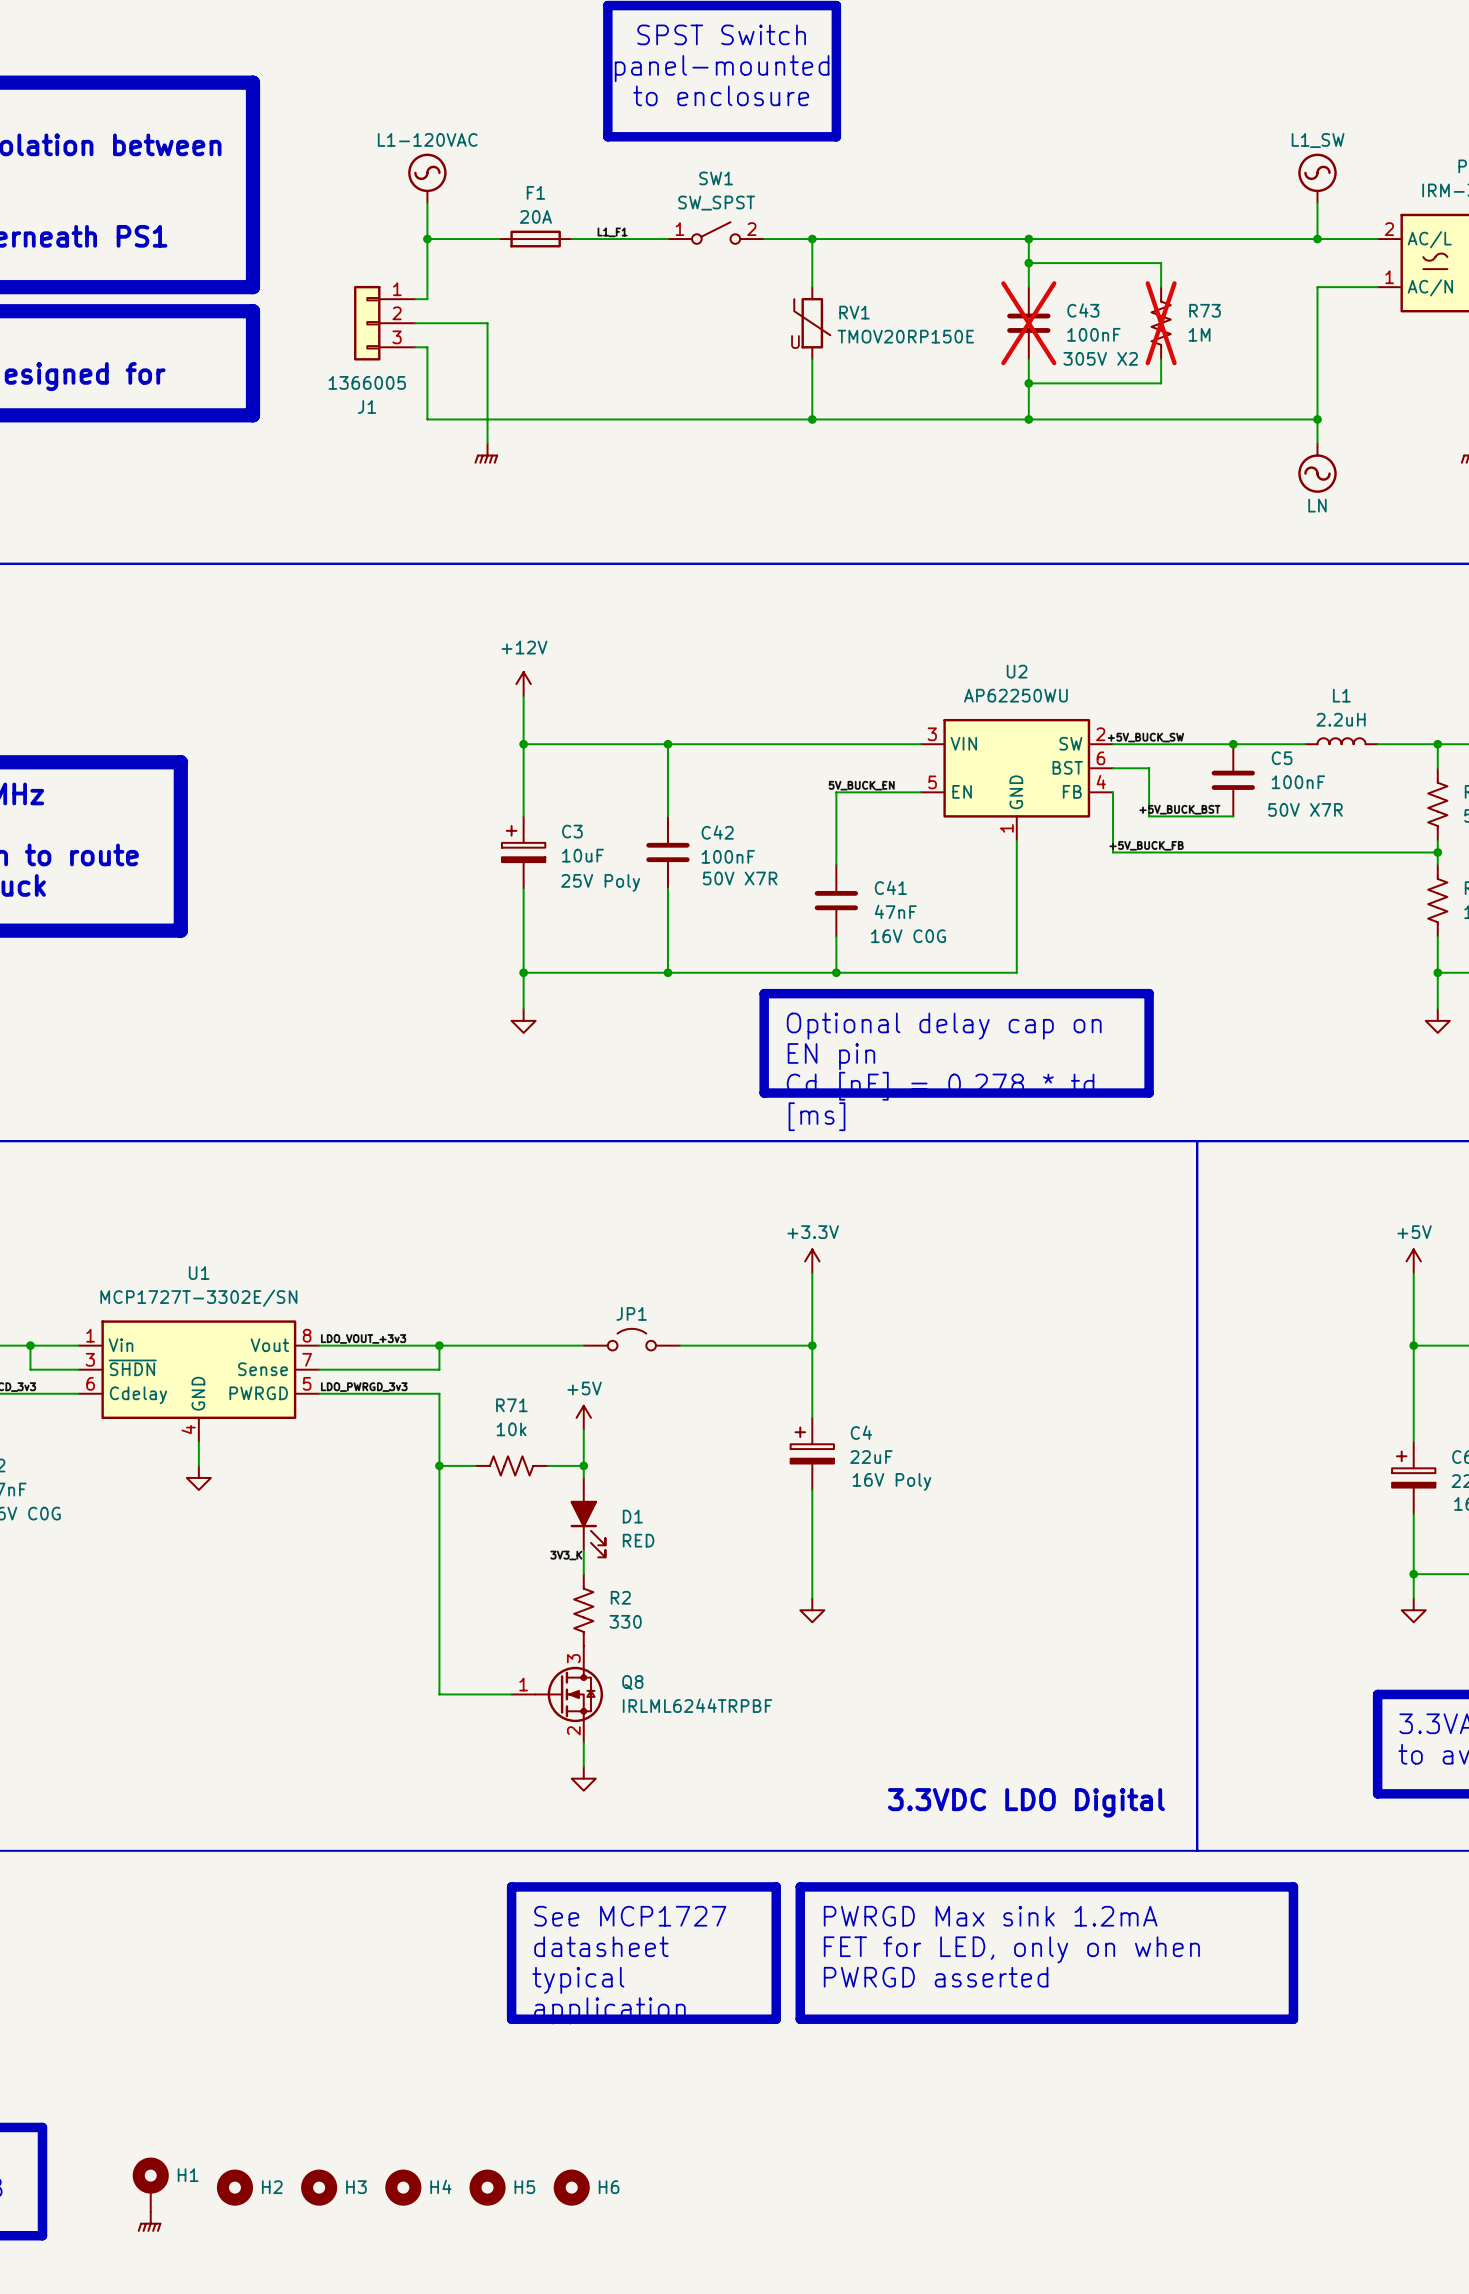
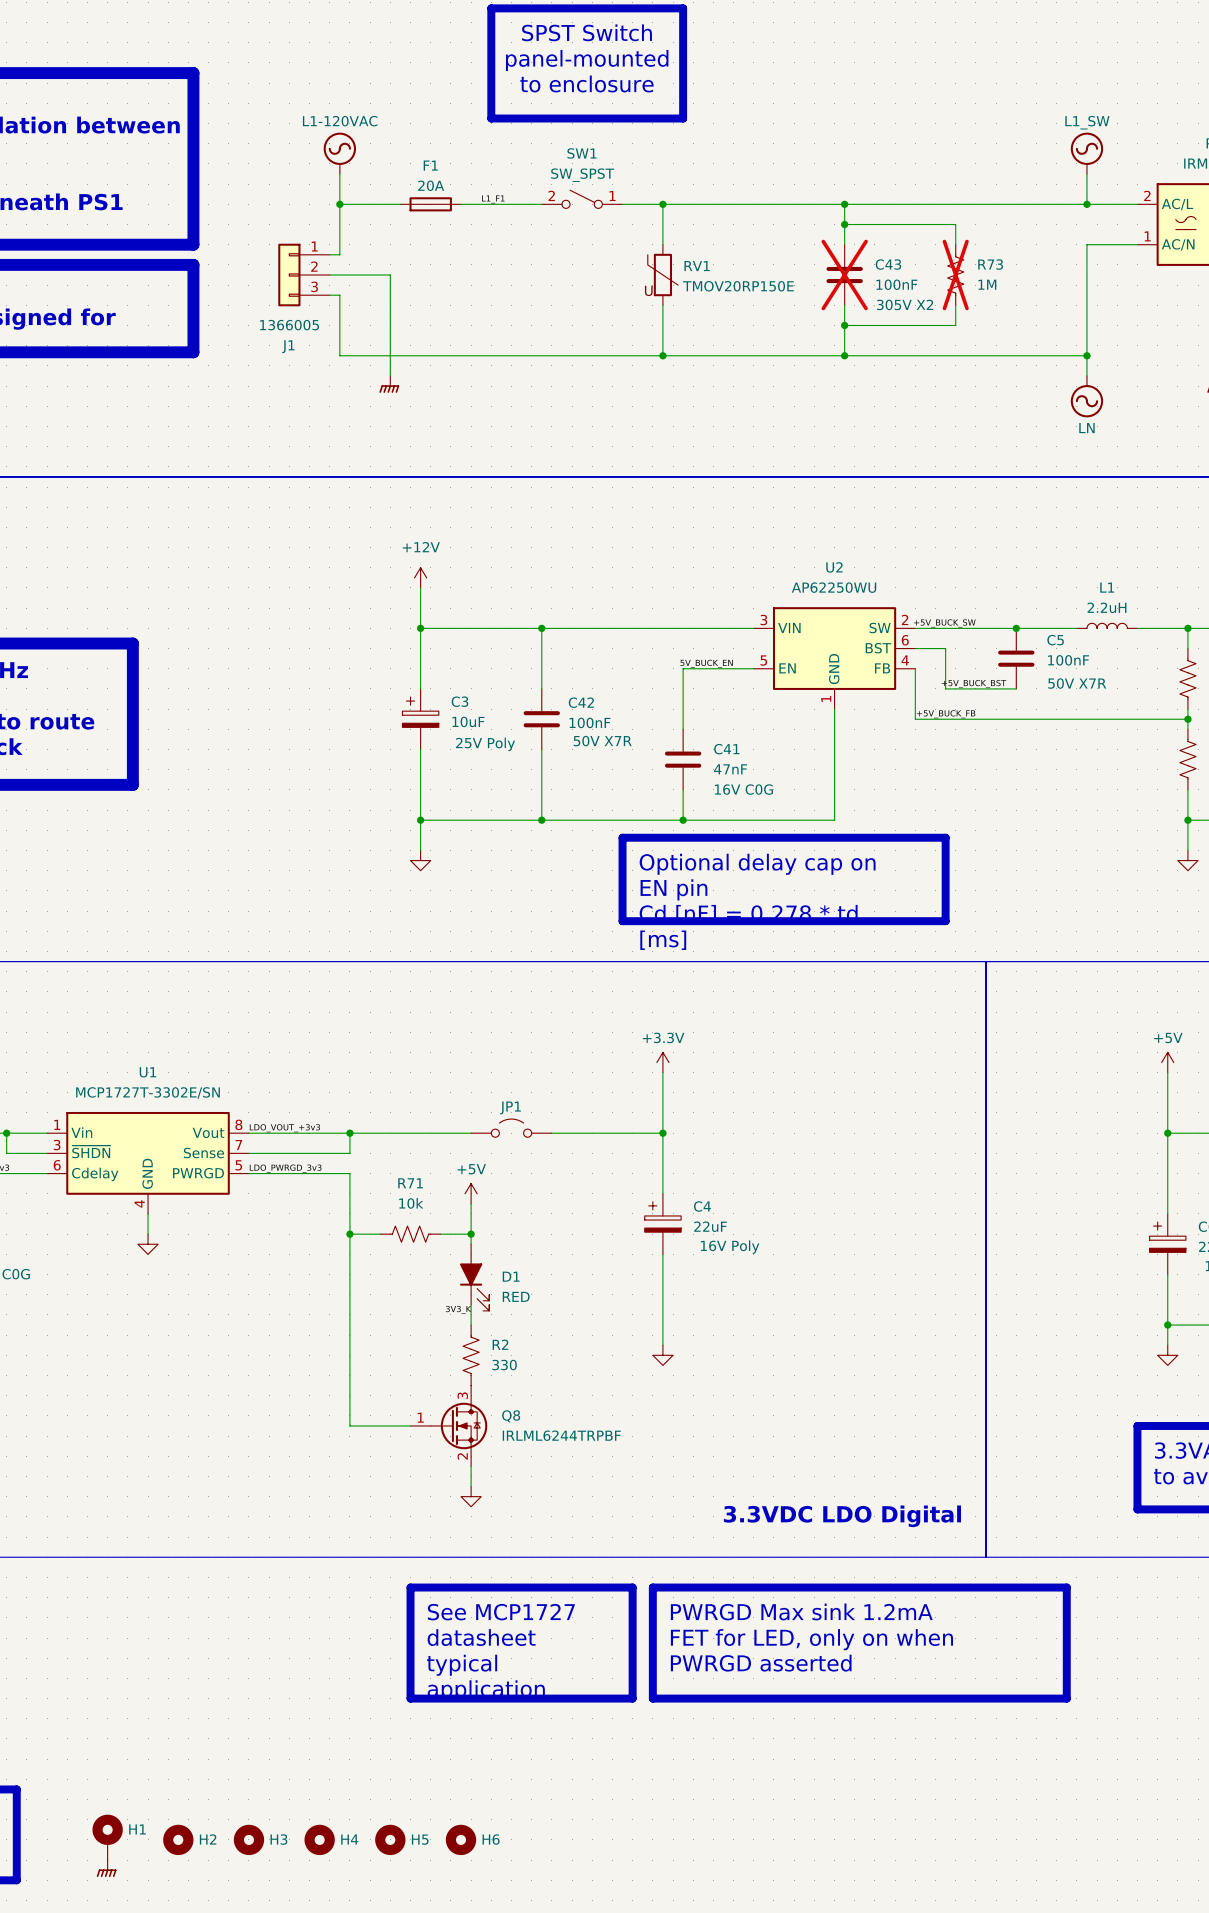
SW1 flip: as is (716, 233) -> left-right (582, 199)

